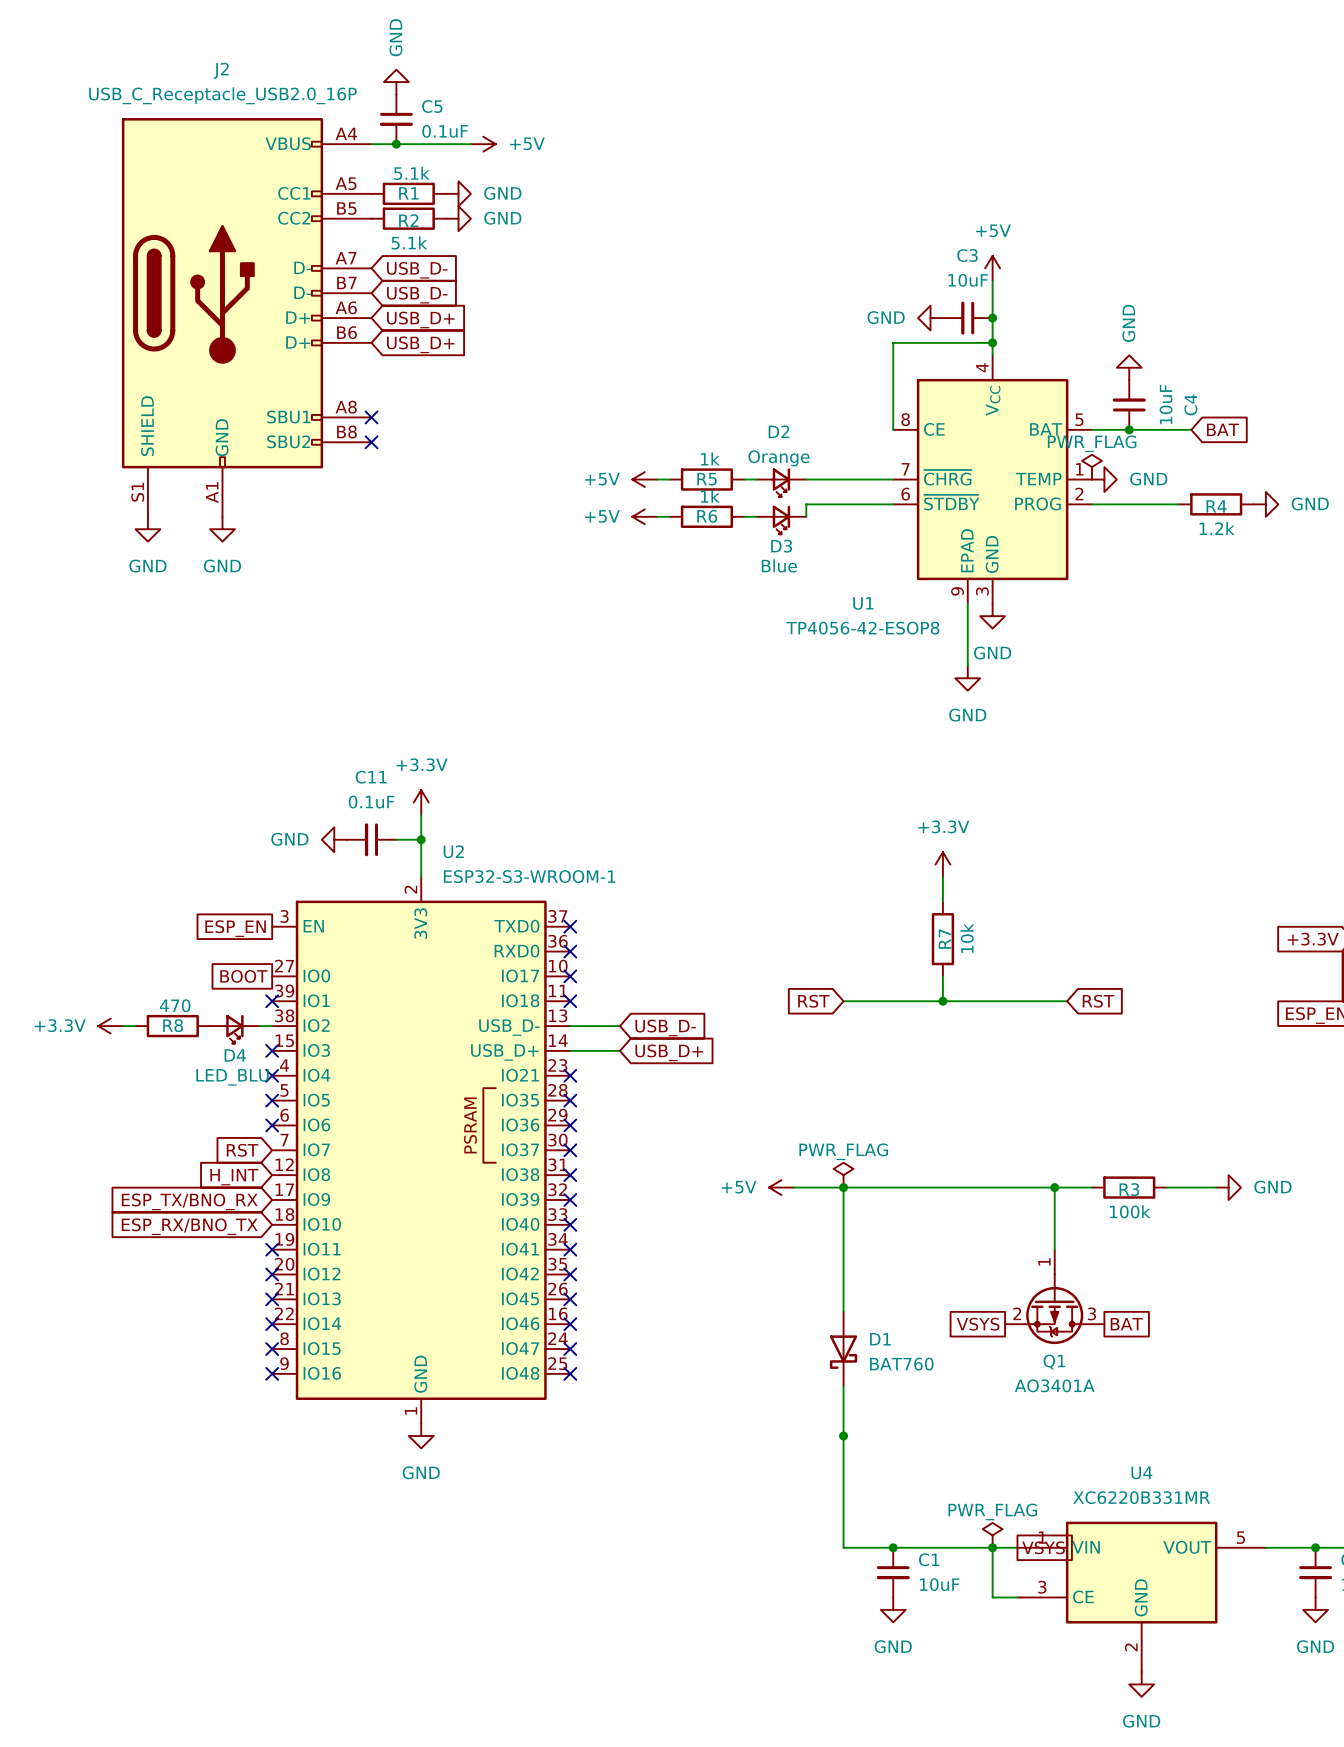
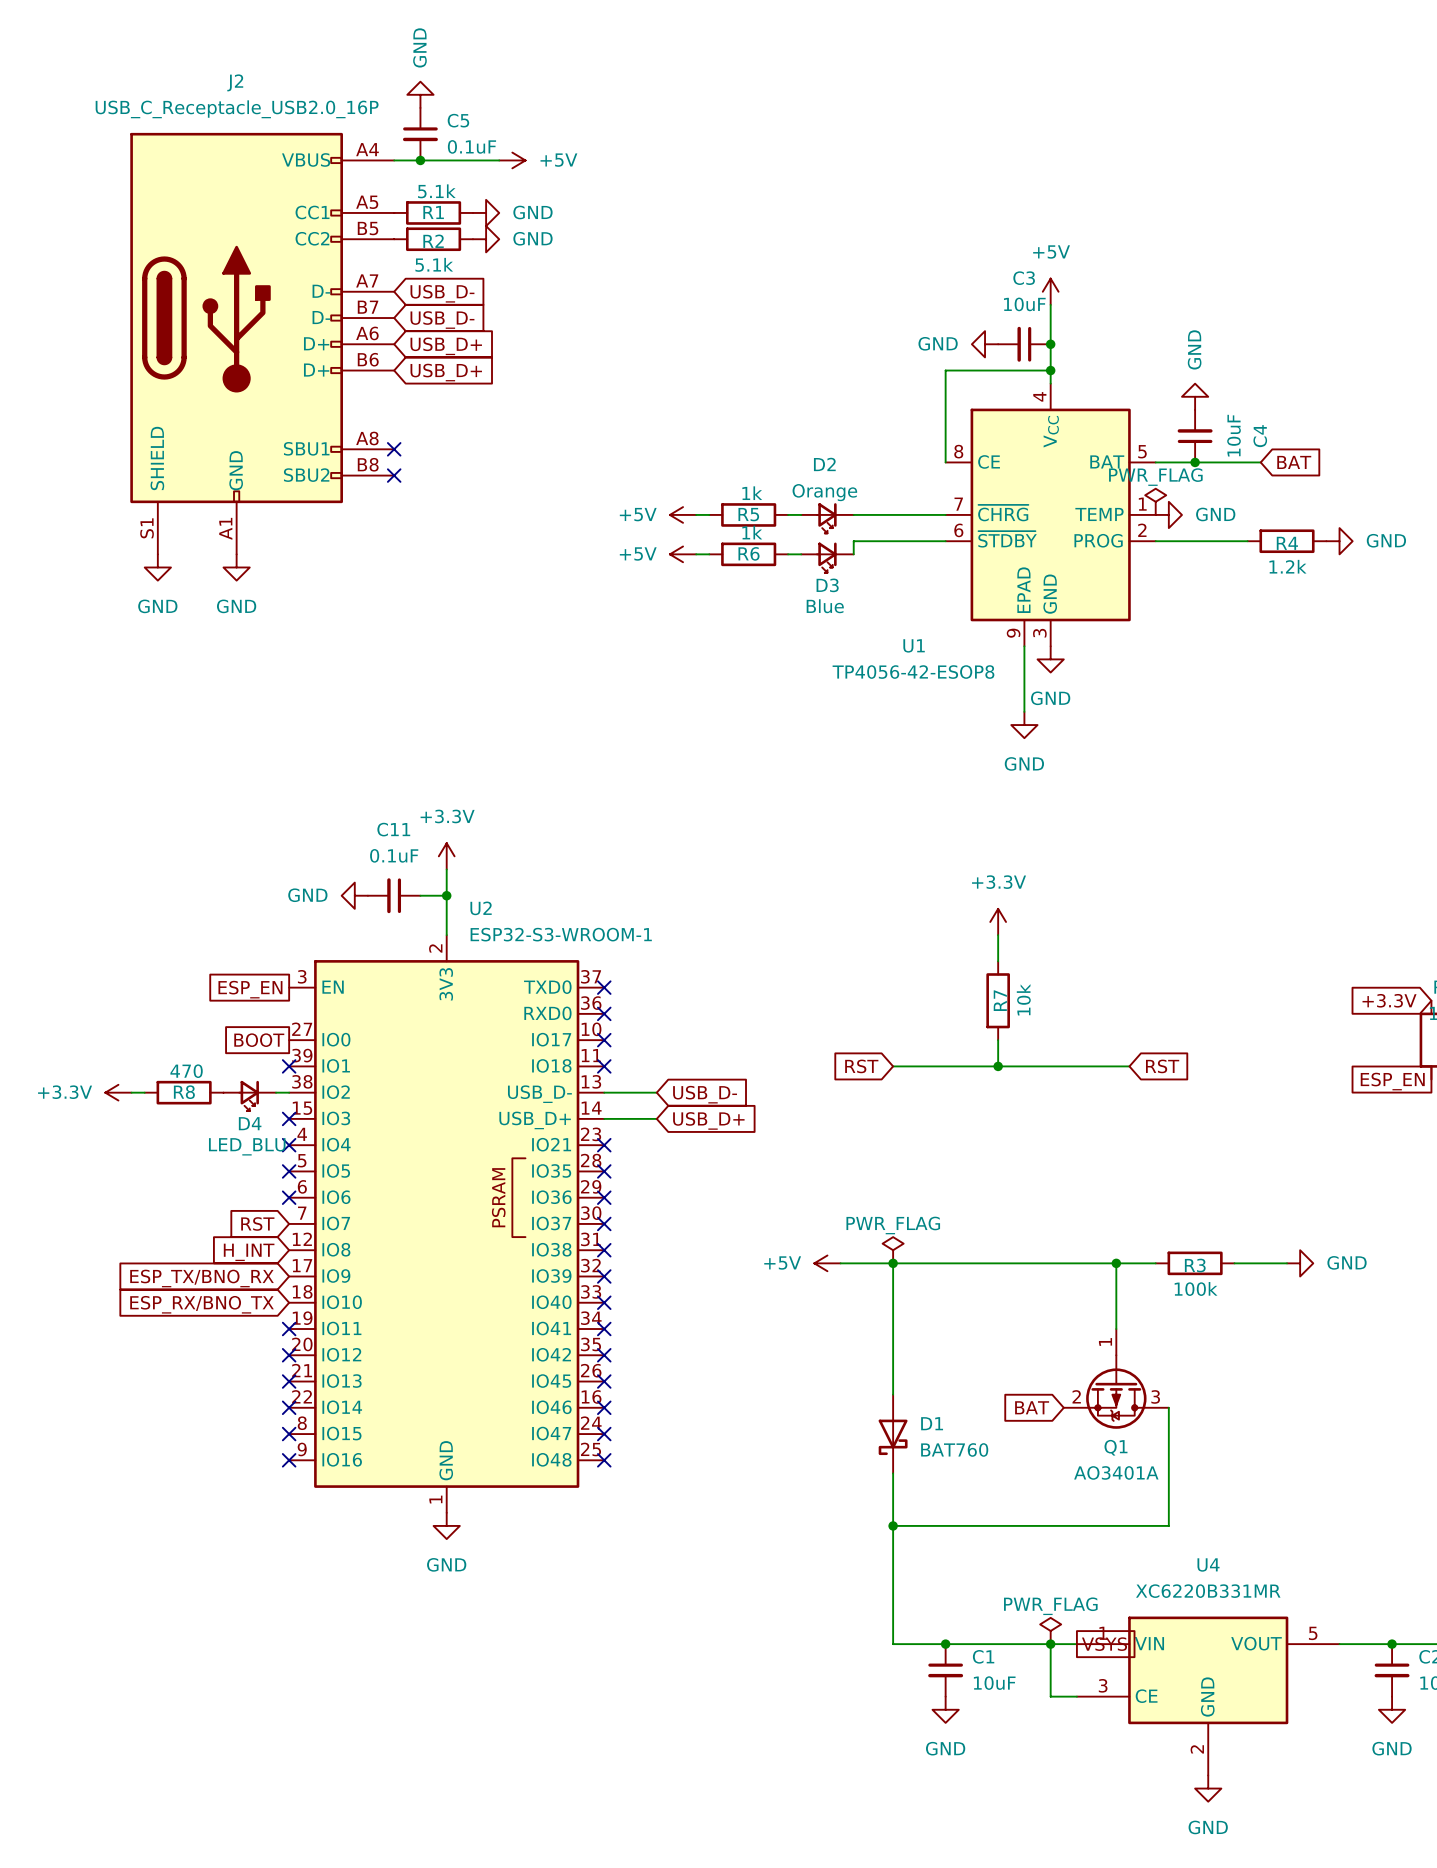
global label shape: passive (978, 1324) -> input (1032, 1407)
global label: VSYS (978, 1324) -> BAT (1032, 1407)
wire: none -> (1168, 1407) (1168, 1525) (893, 1525)
global label: BAT (1126, 1324) -> none

